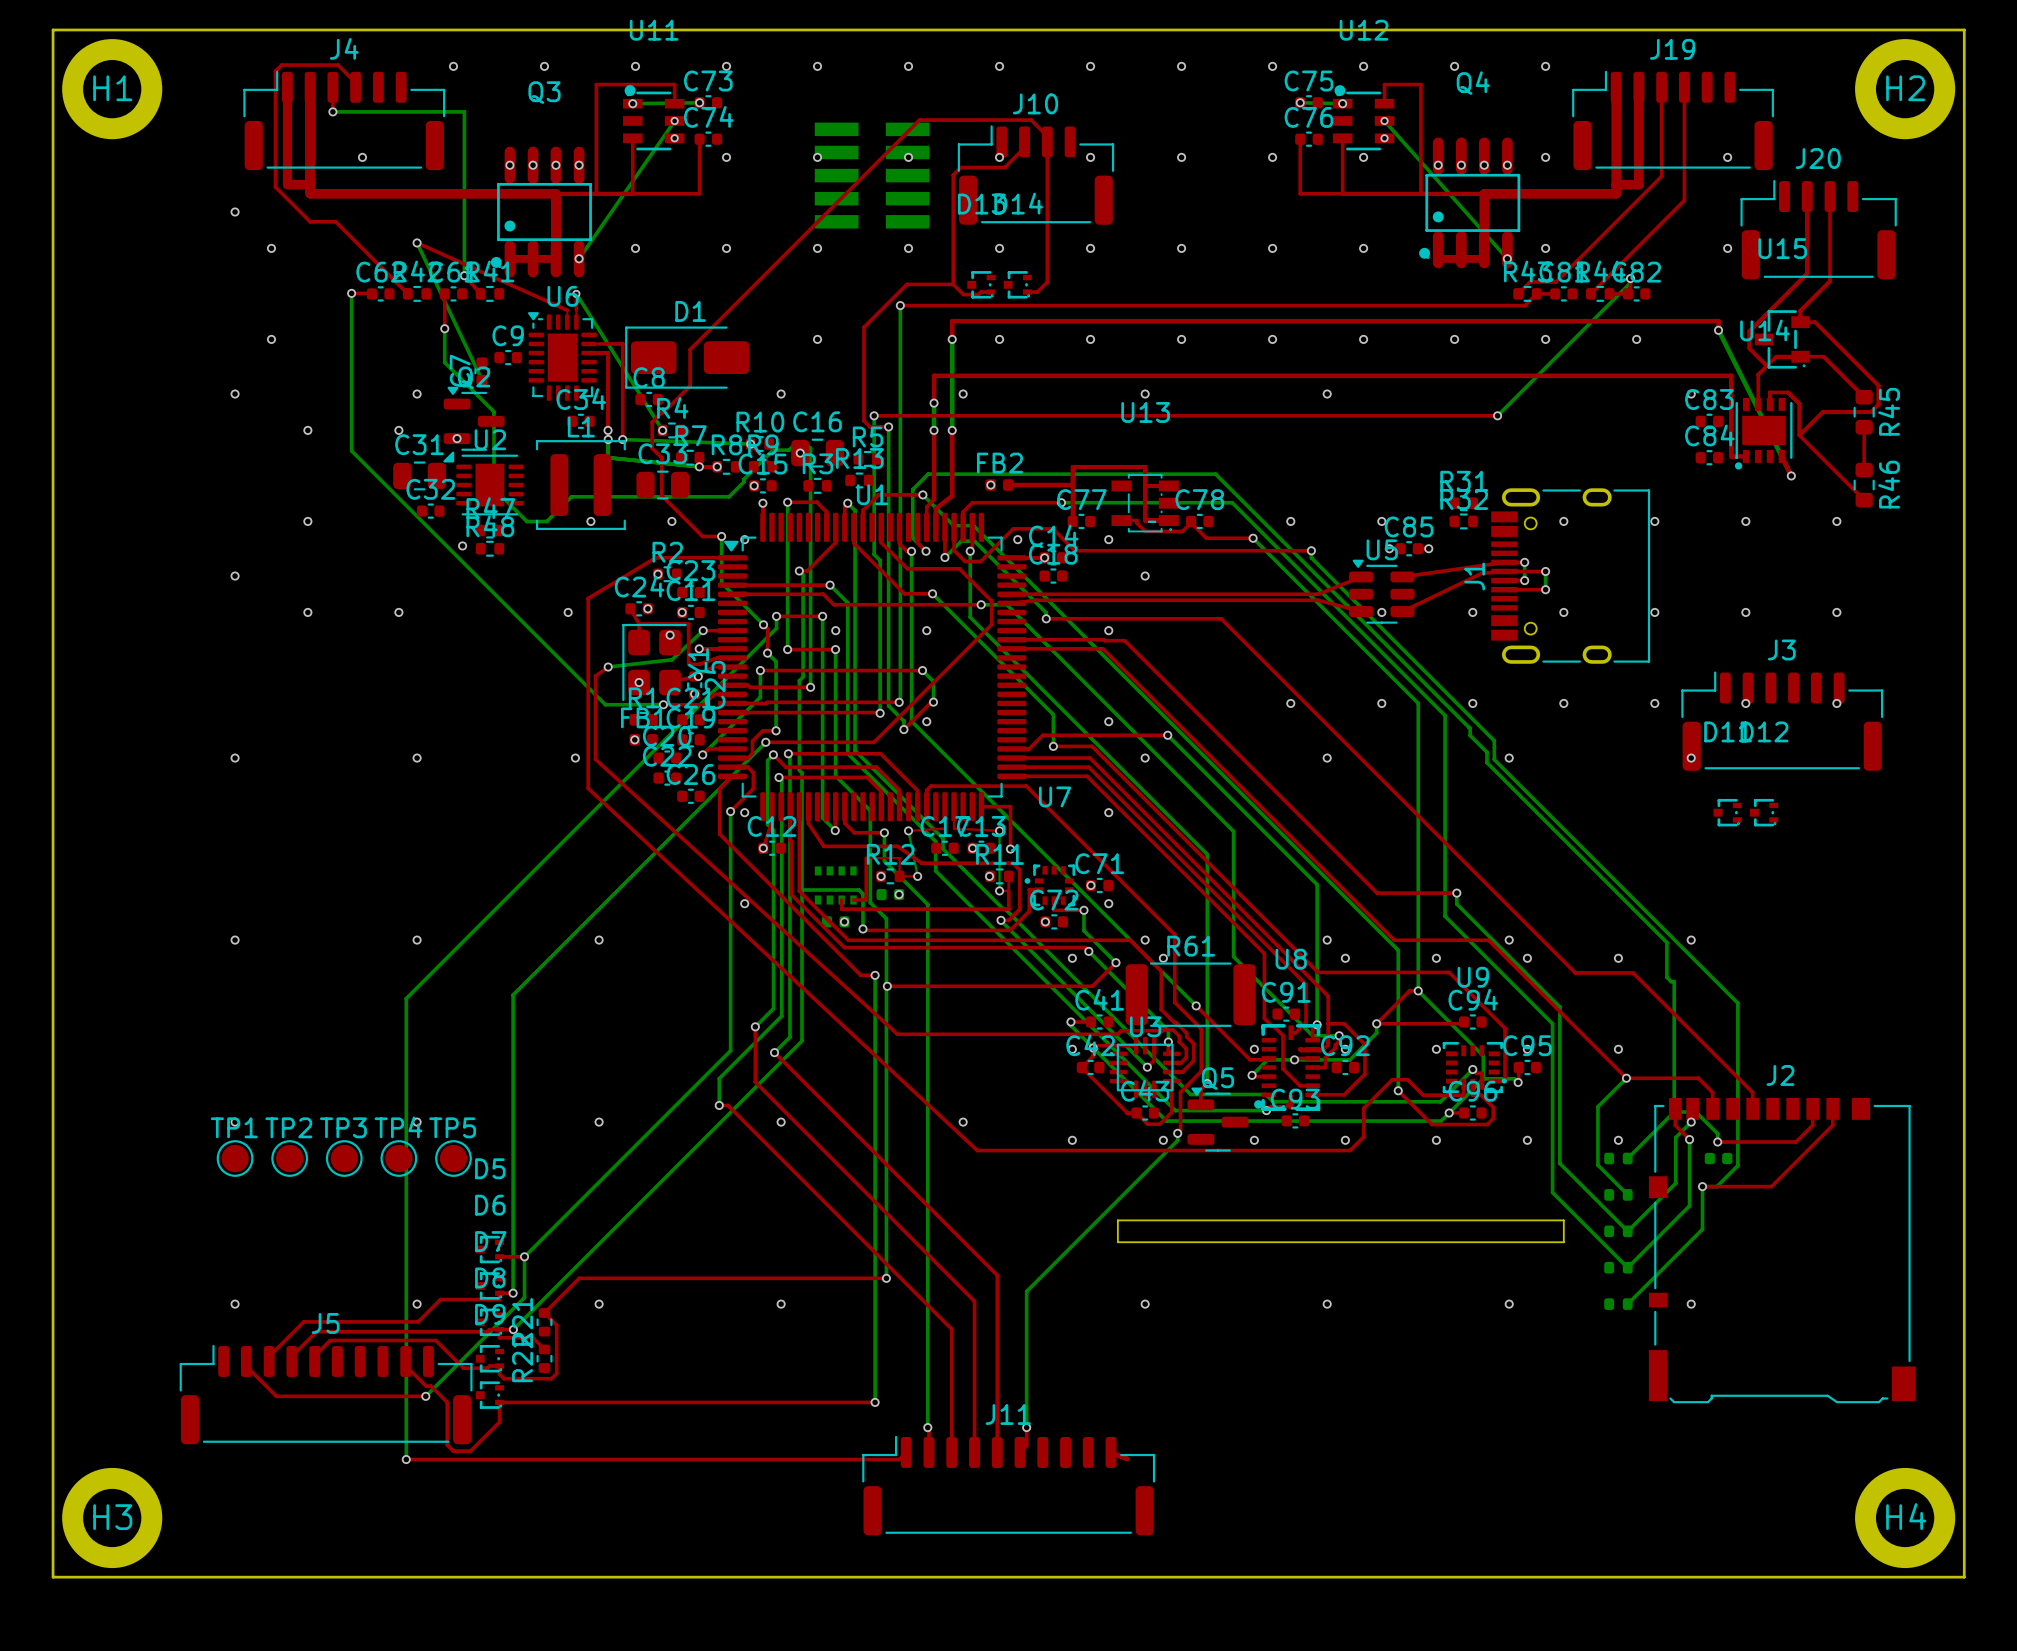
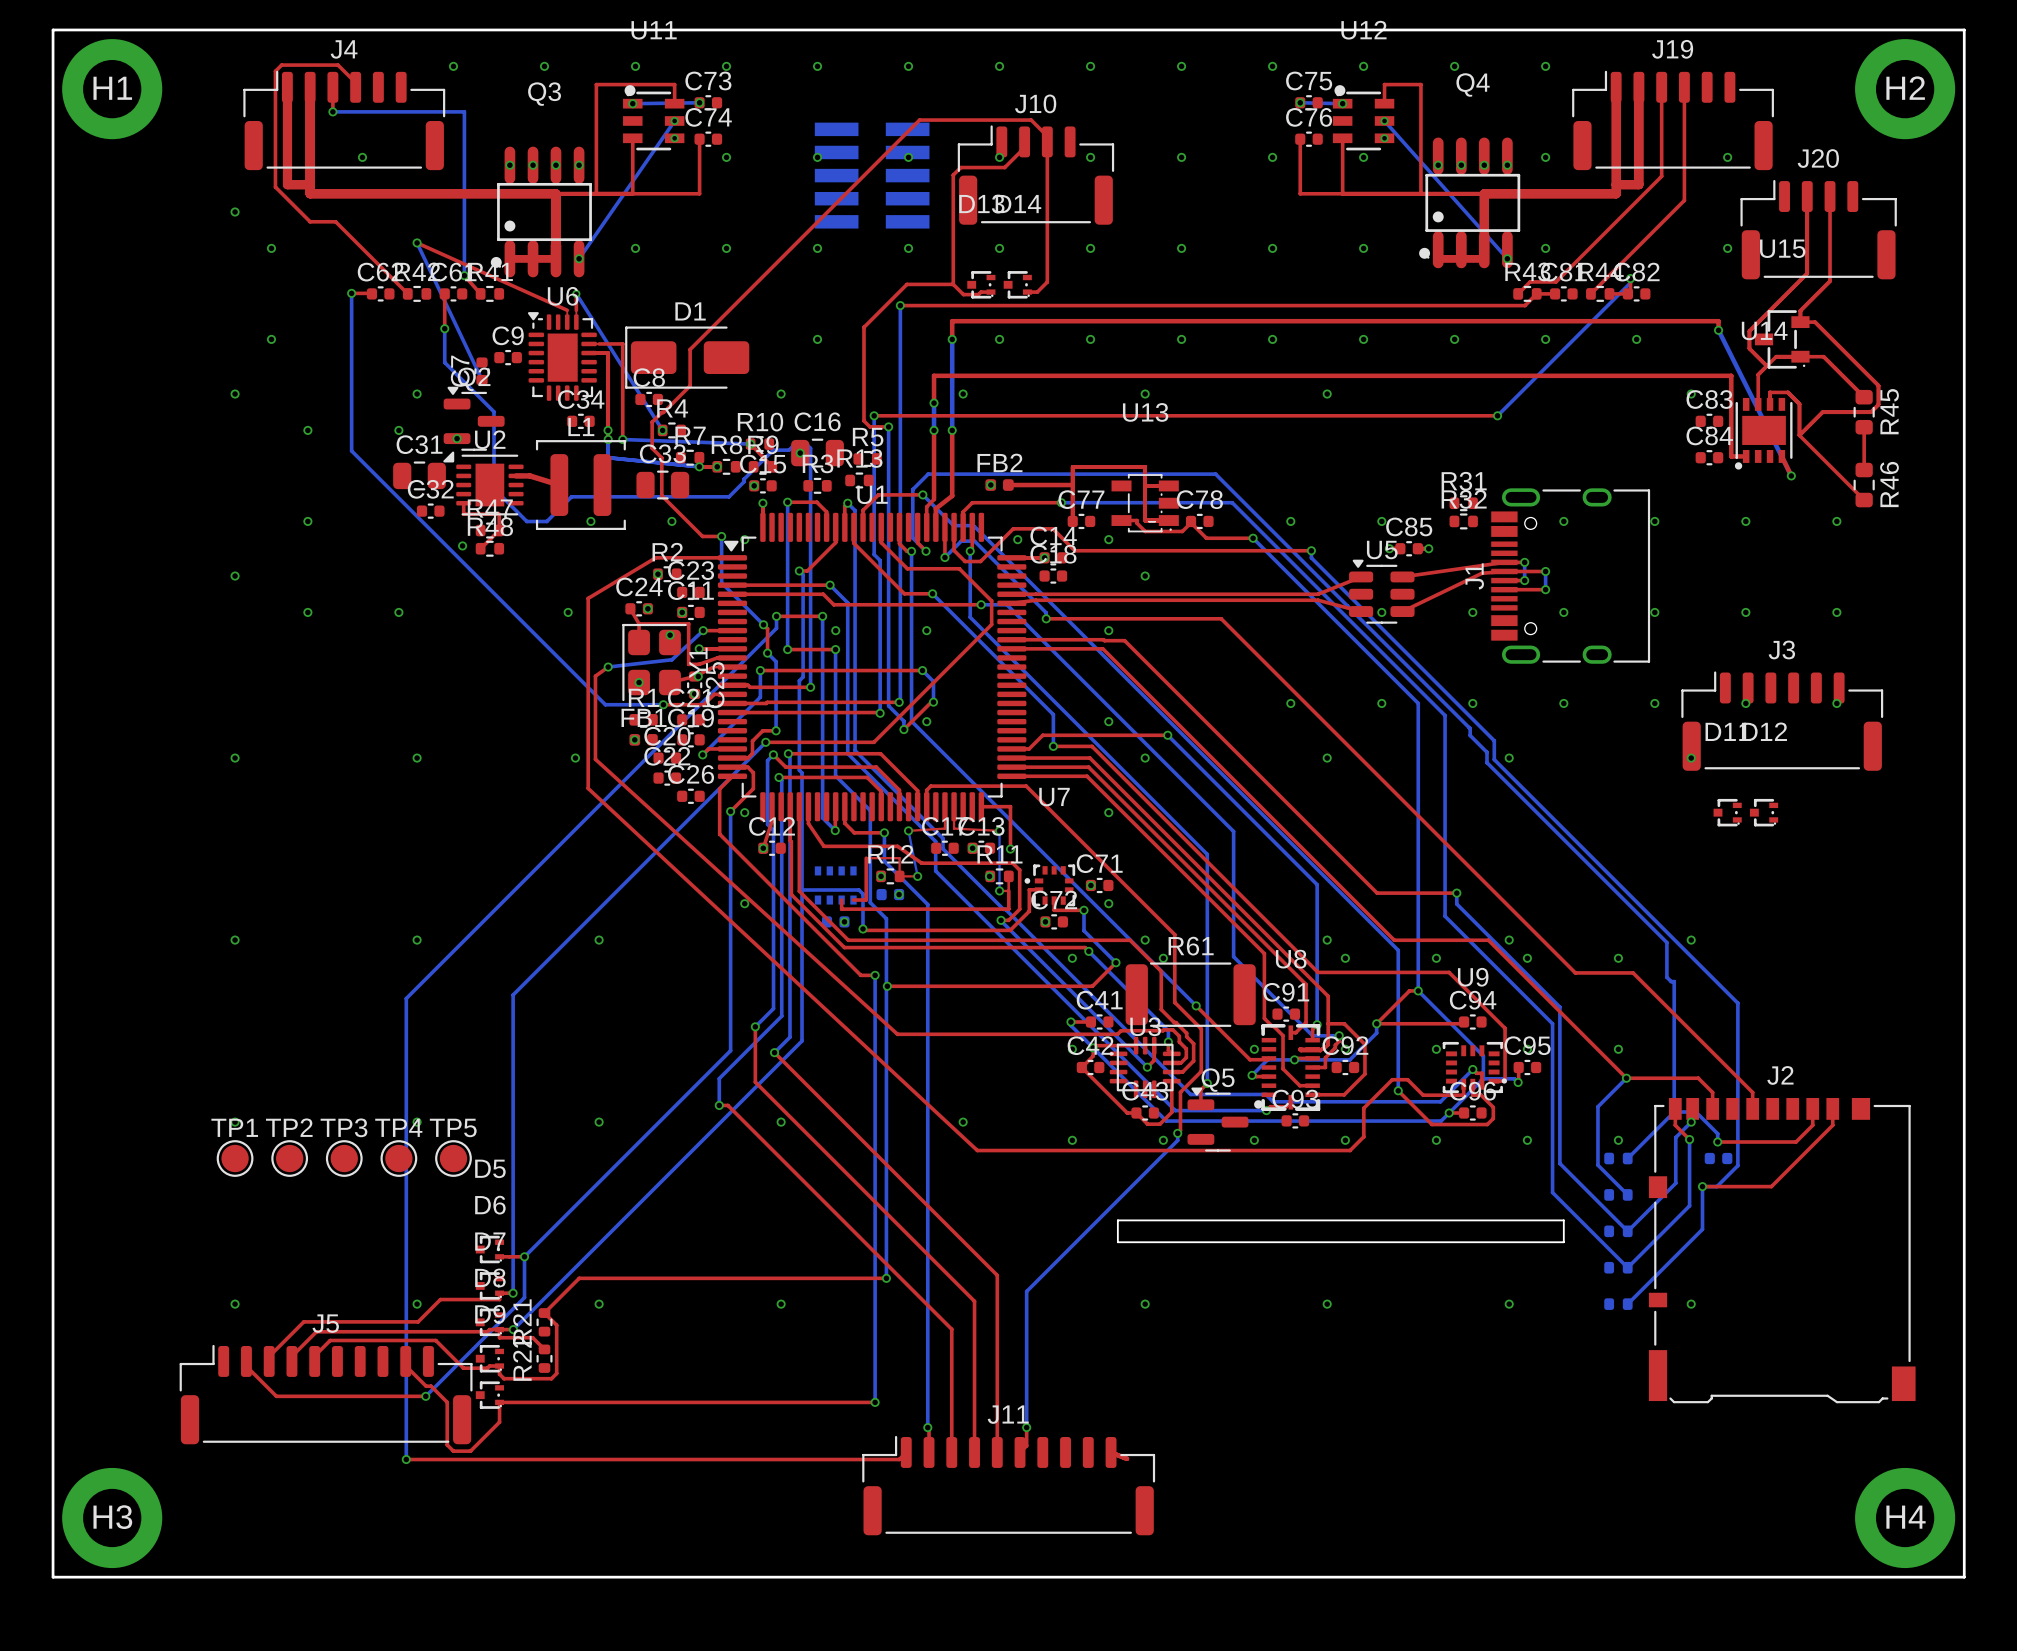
top track: none -> (516, 475) (529, 475) (559, 485)
top track: none -> (463, 503) (463, 514) (499, 514) (499, 530) (480, 548)

